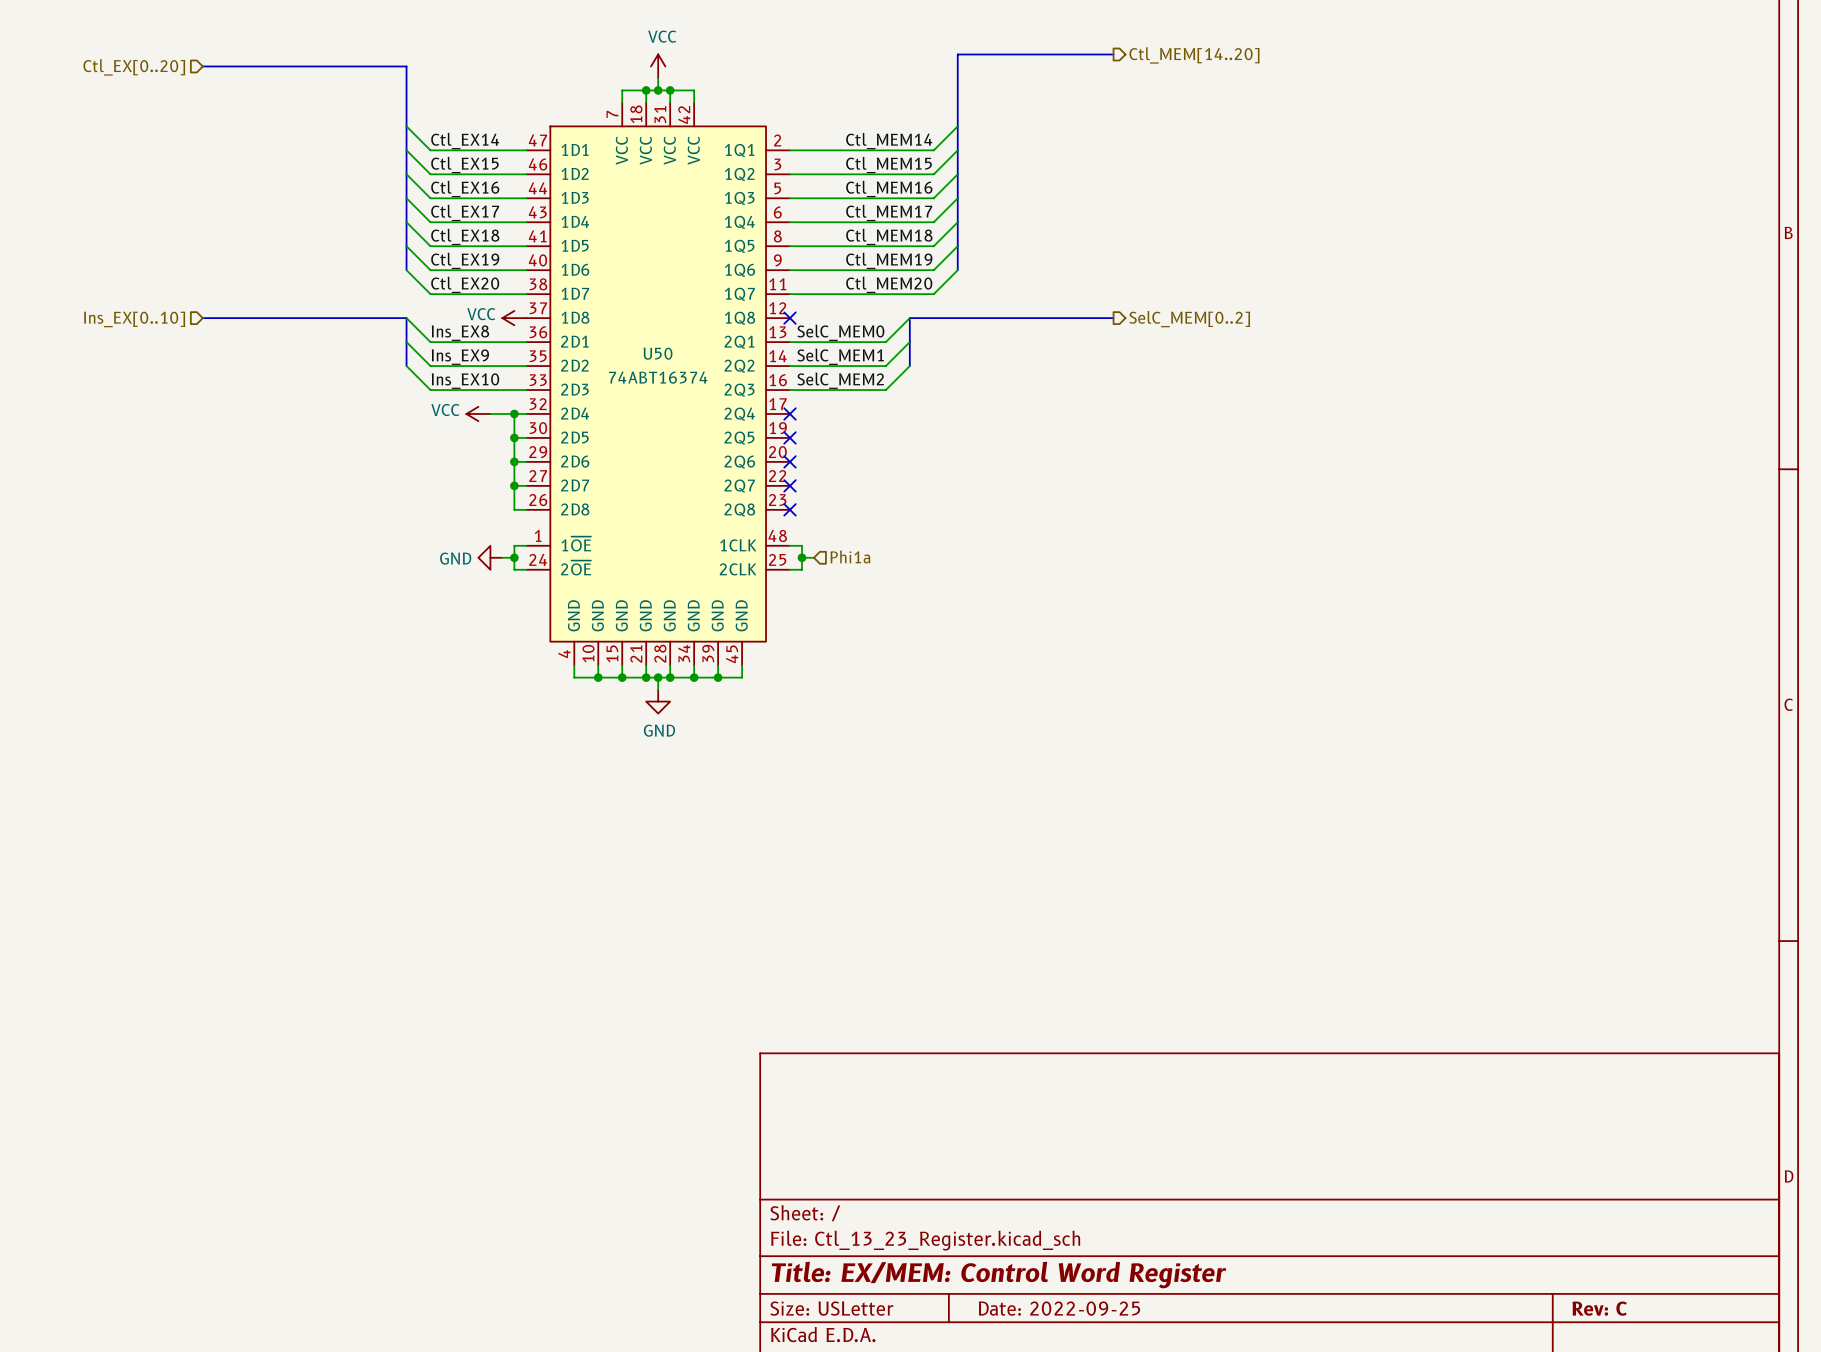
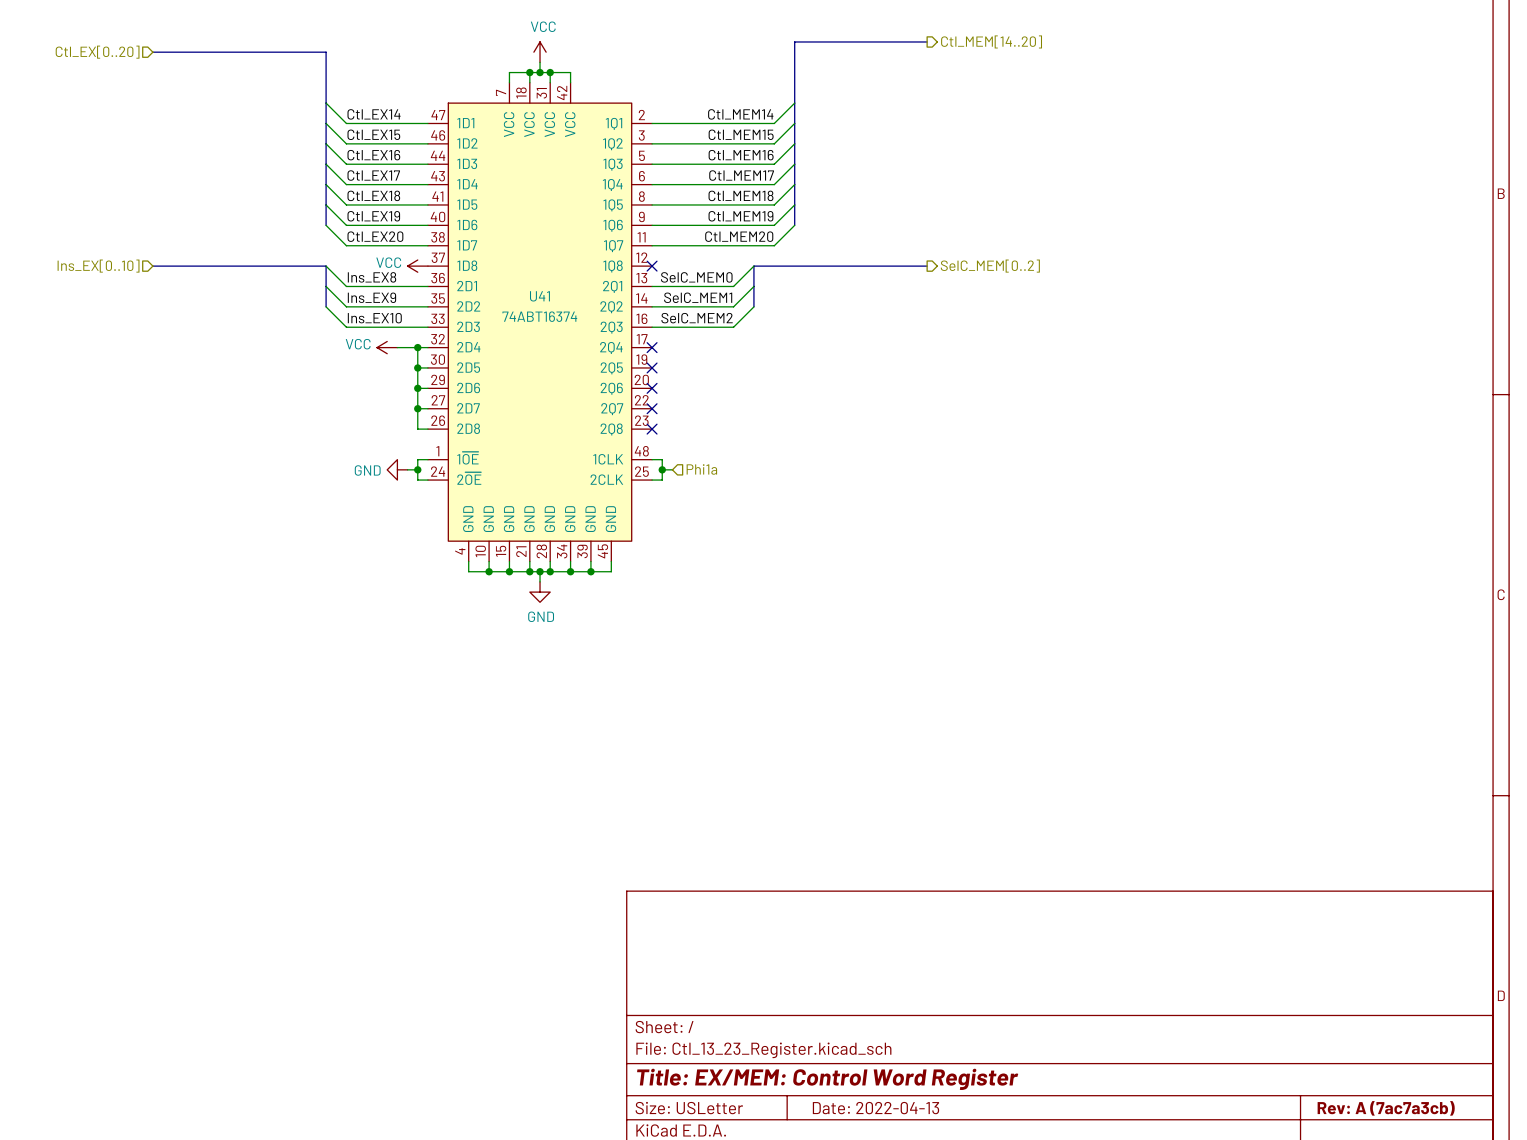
U50 name: U50 (658, 353) -> U41 (539, 296)
title block: Date: 2022-09-25 (1059, 1308) -> Date: 2022-04-13 (875, 1108)
title block: Rev: C (1599, 1308) -> Rev: A (7ac7a3cb) (1386, 1108)

